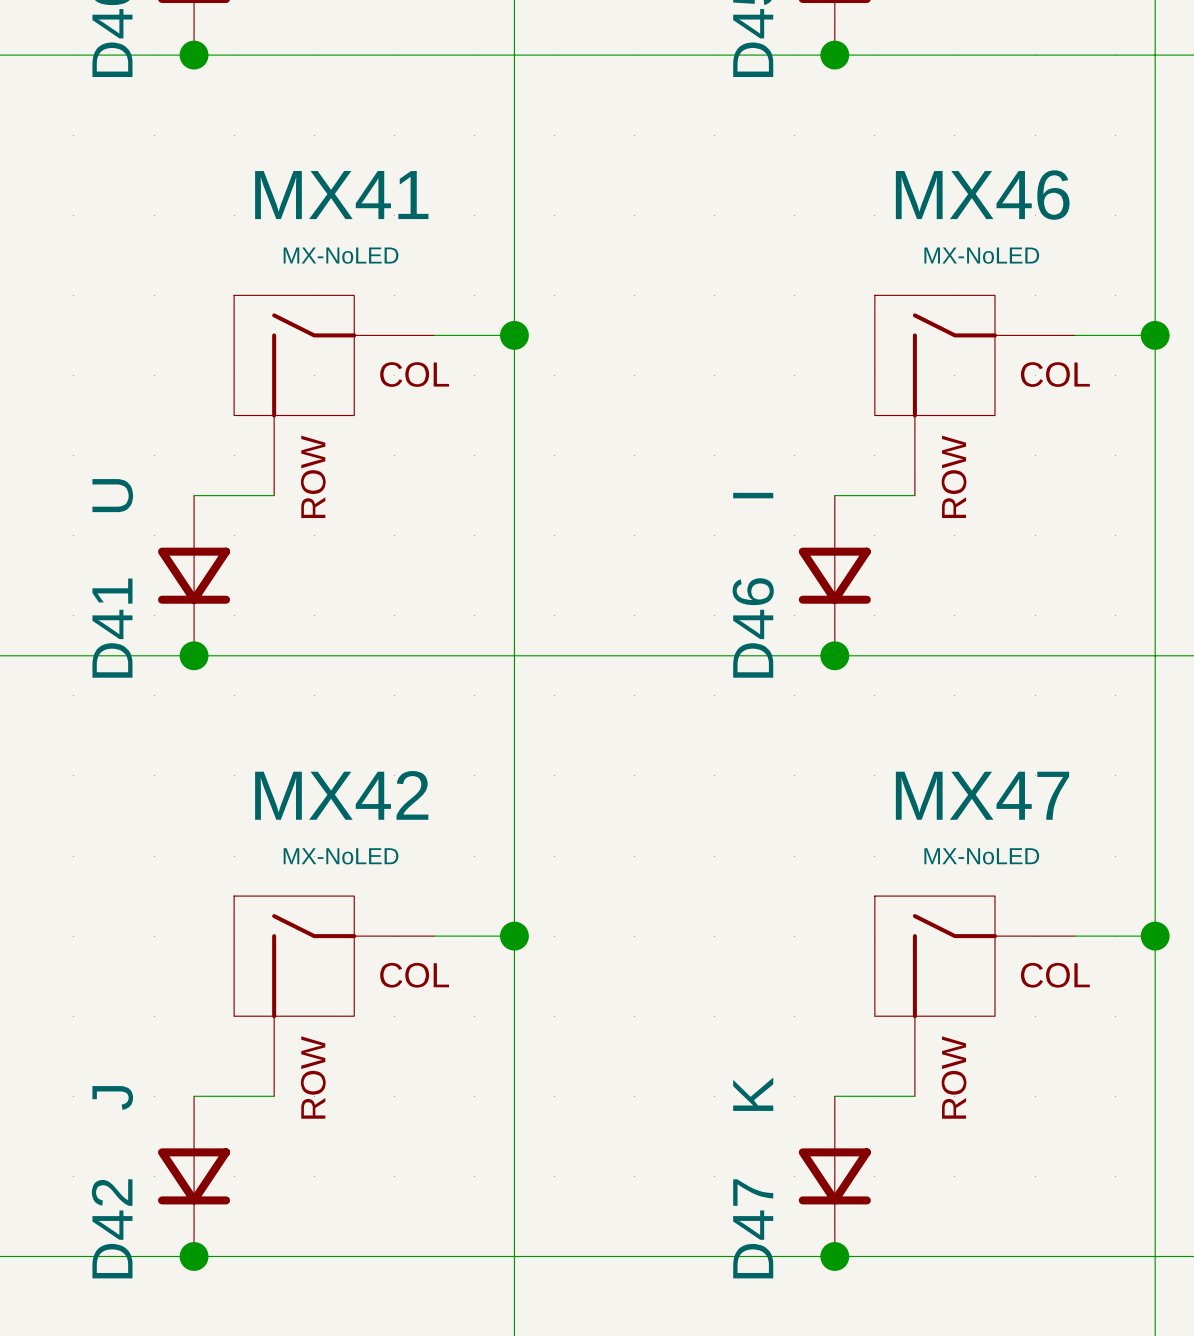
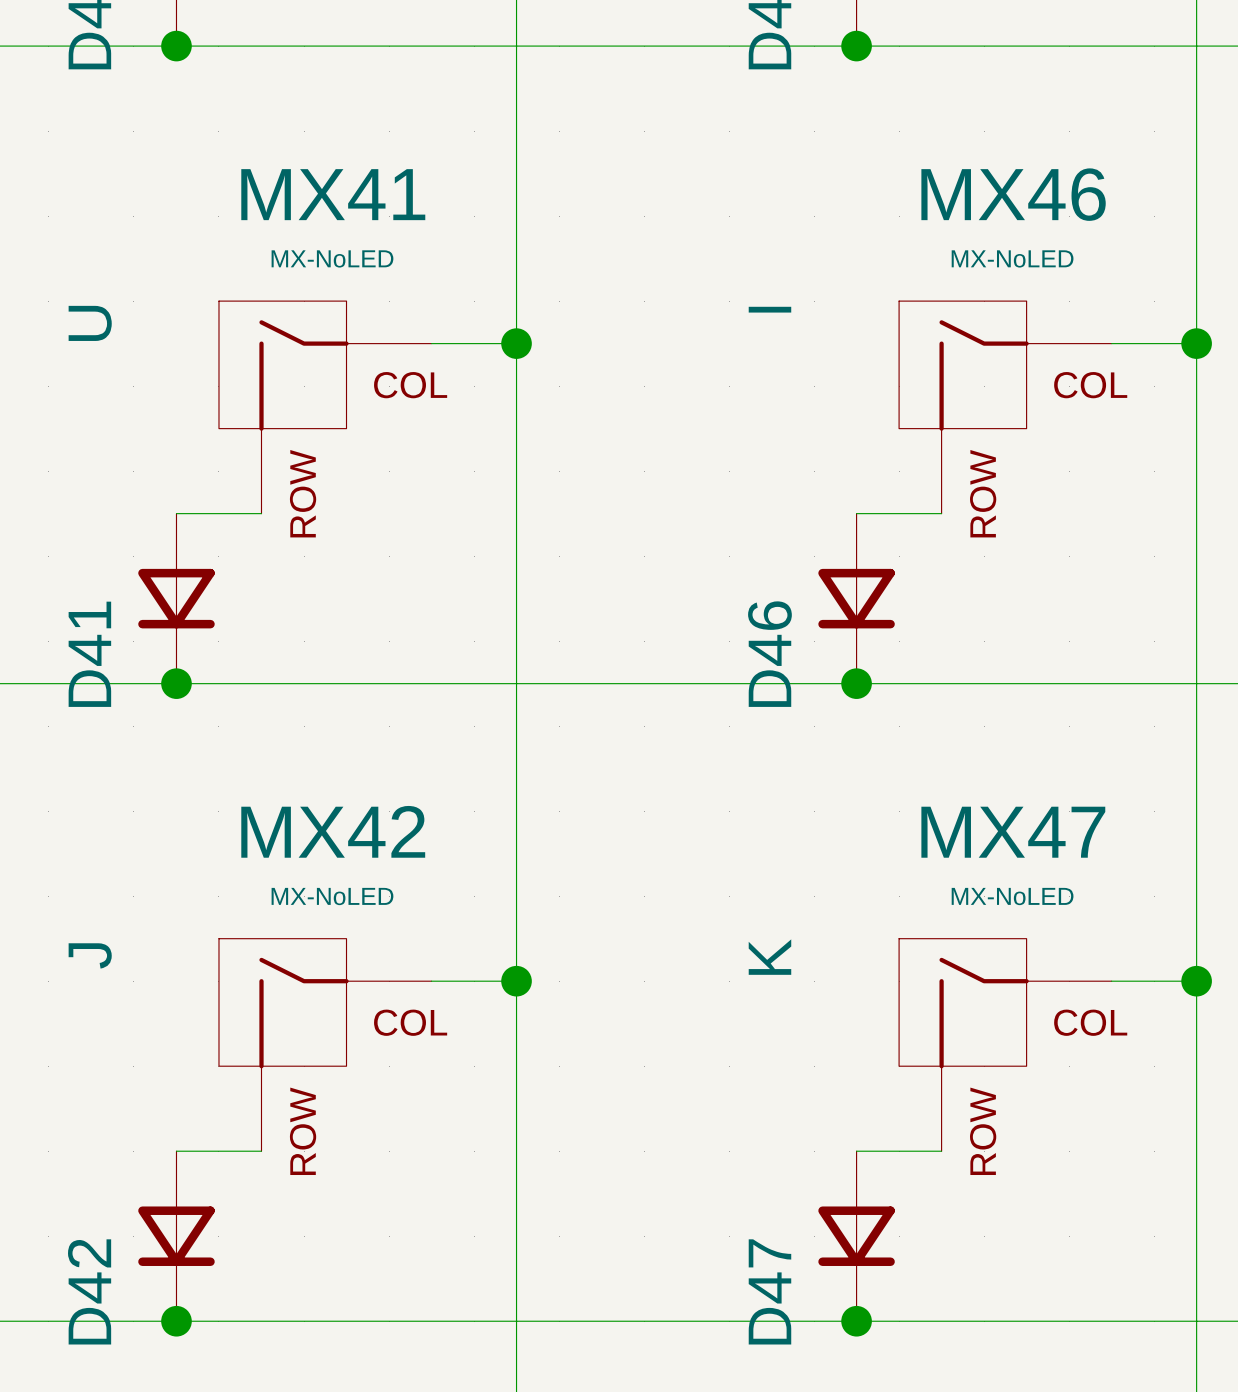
D46 value: none -> I (769, 309)
D41 value: none -> U (90, 323)
D41 text: U (112, 495) -> none
D46 text: I (753, 495) -> none
D42 value: none -> J (90, 955)
D47 value: none -> K (769, 957)
D47 text: K (753, 1094) -> none
D42 text: J (112, 1098) -> none

